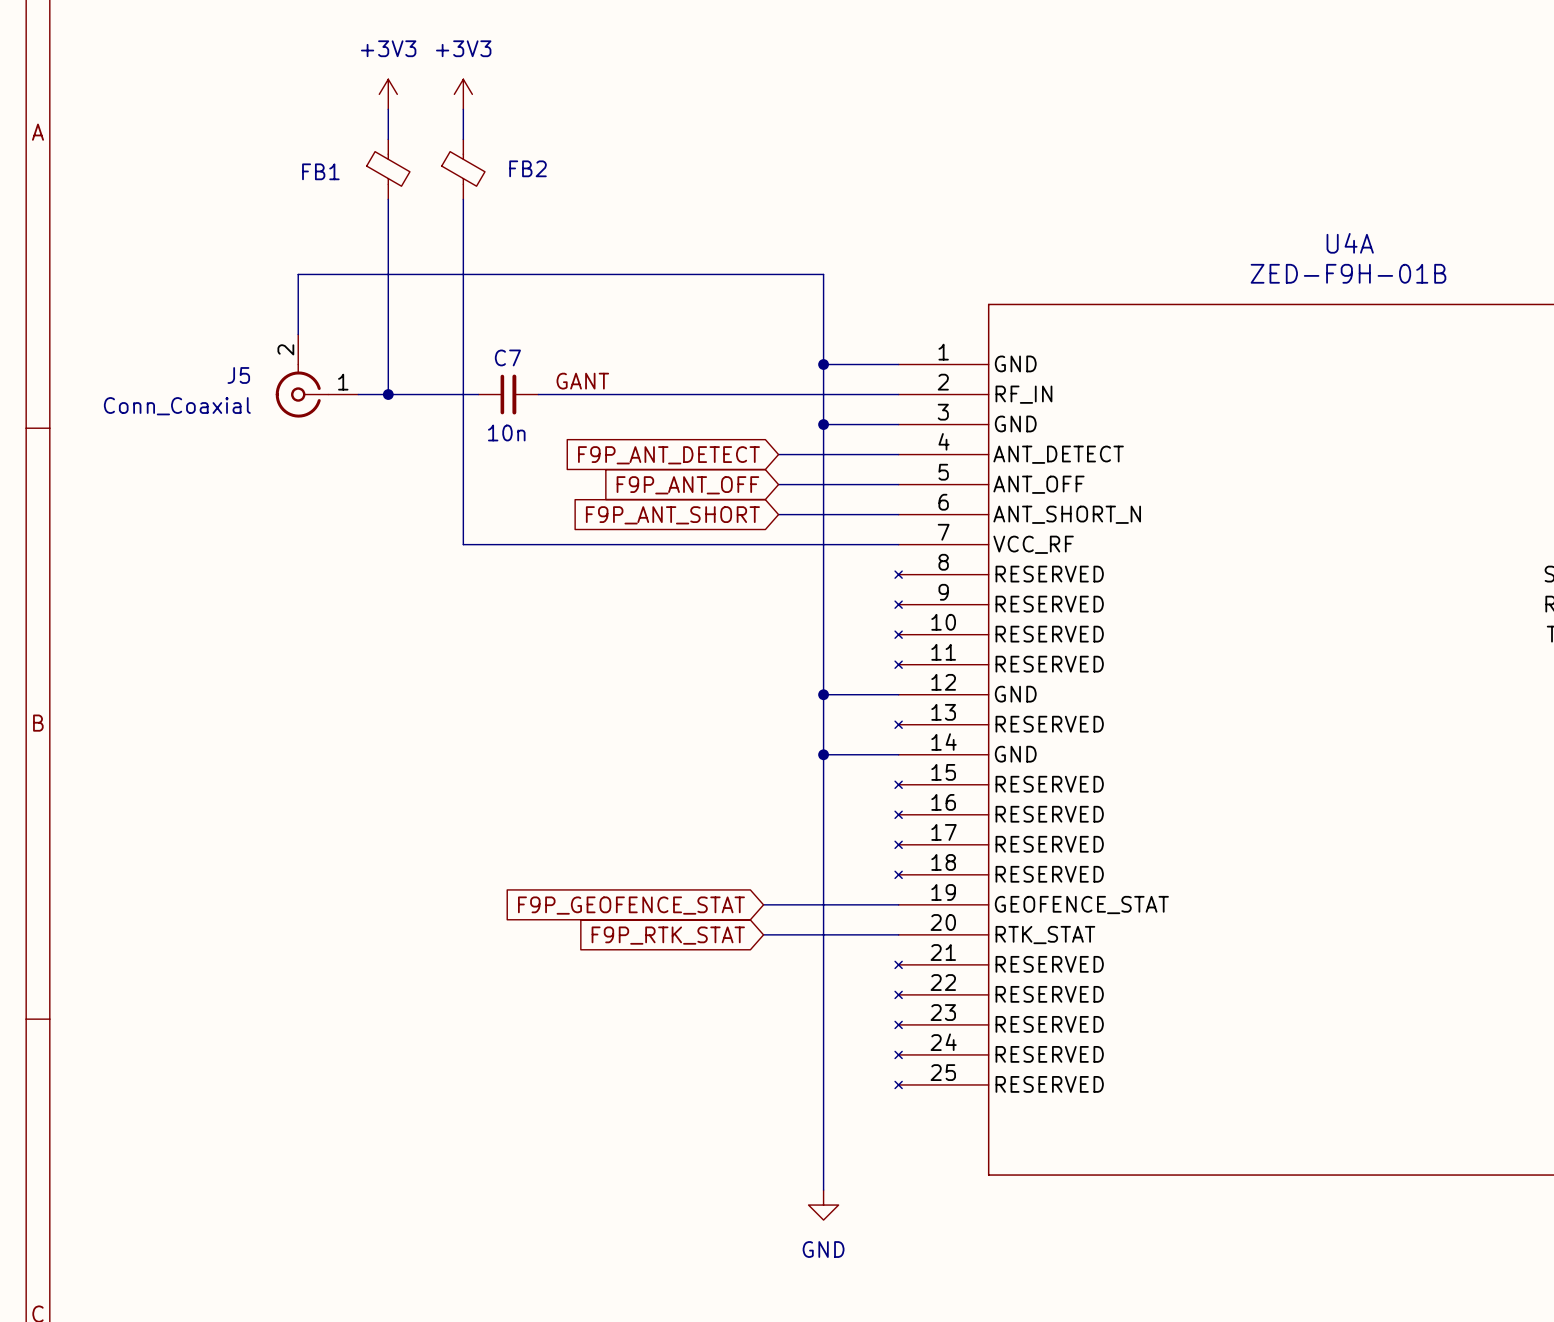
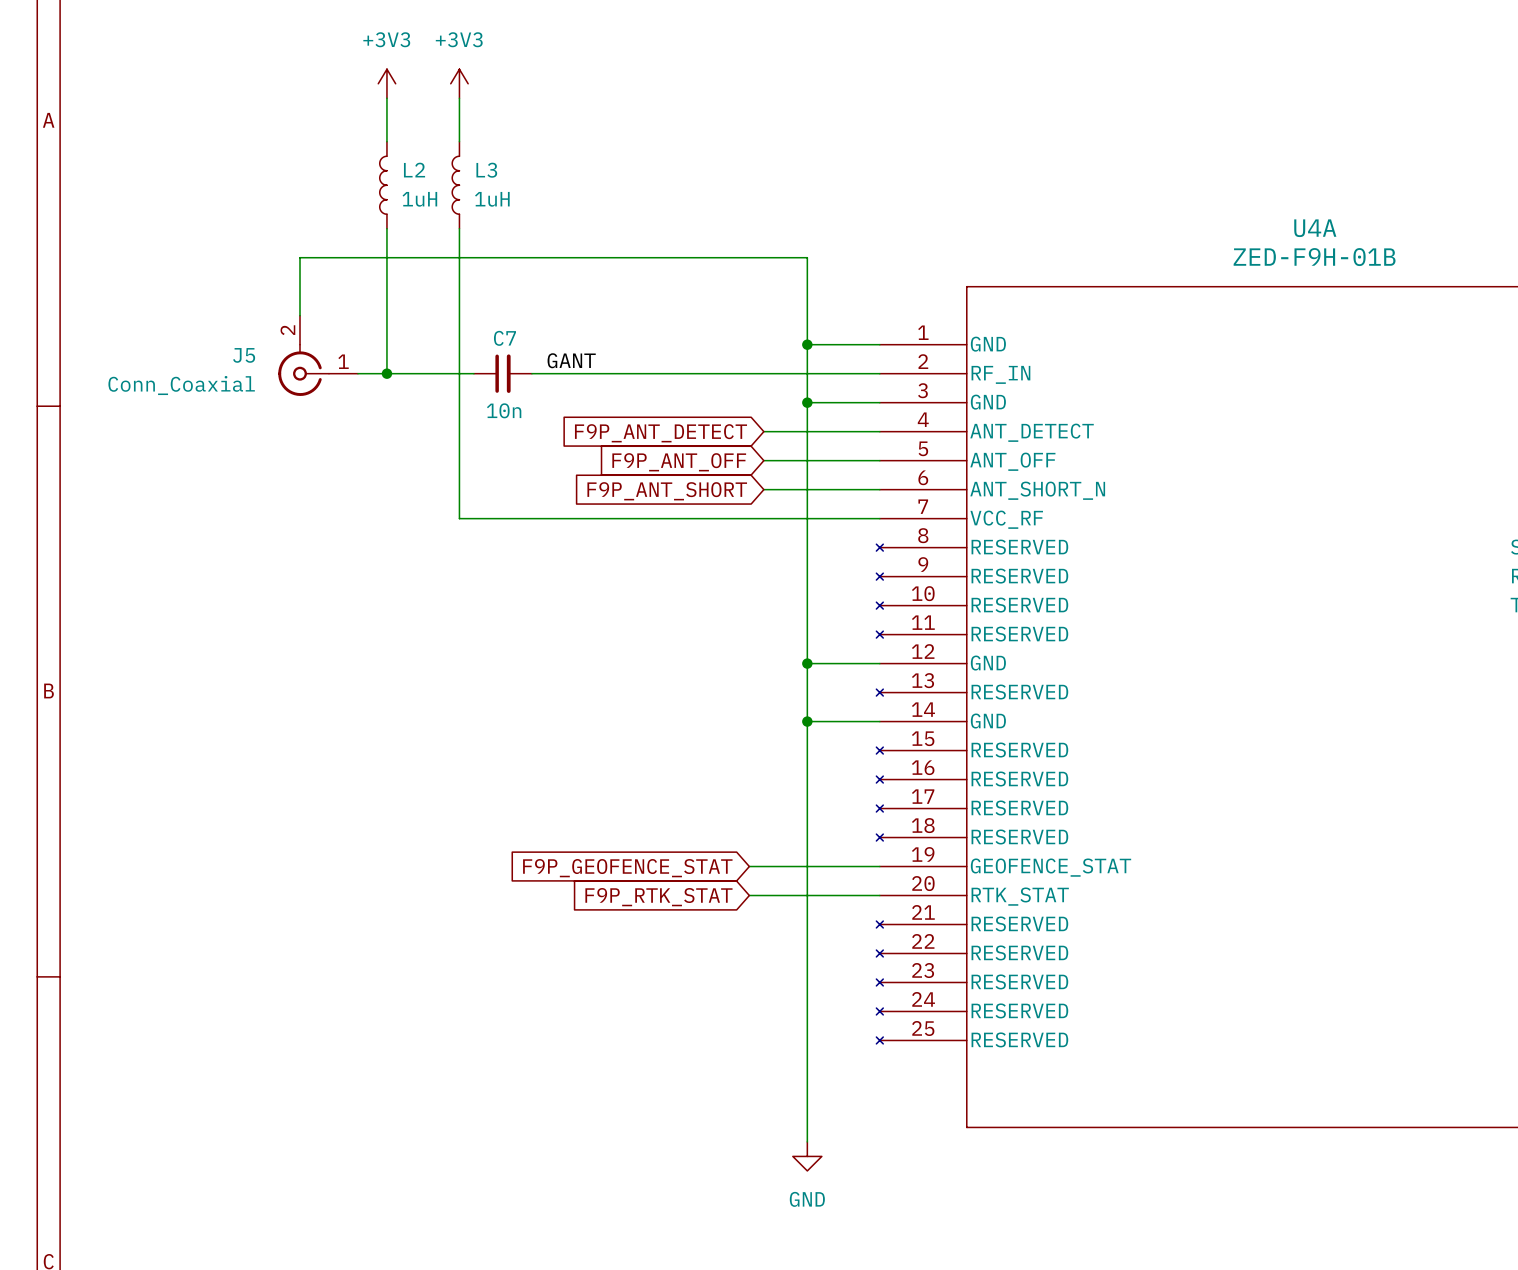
FB1: (388, 169) -> none
FB2: (463, 169) -> none
L2: none -> 1uH (383, 185)
wire: (388, 199) (388, 244) -> none
L3: none -> 1uH (455, 185)
wire: (463, 199) (463, 244) -> none

